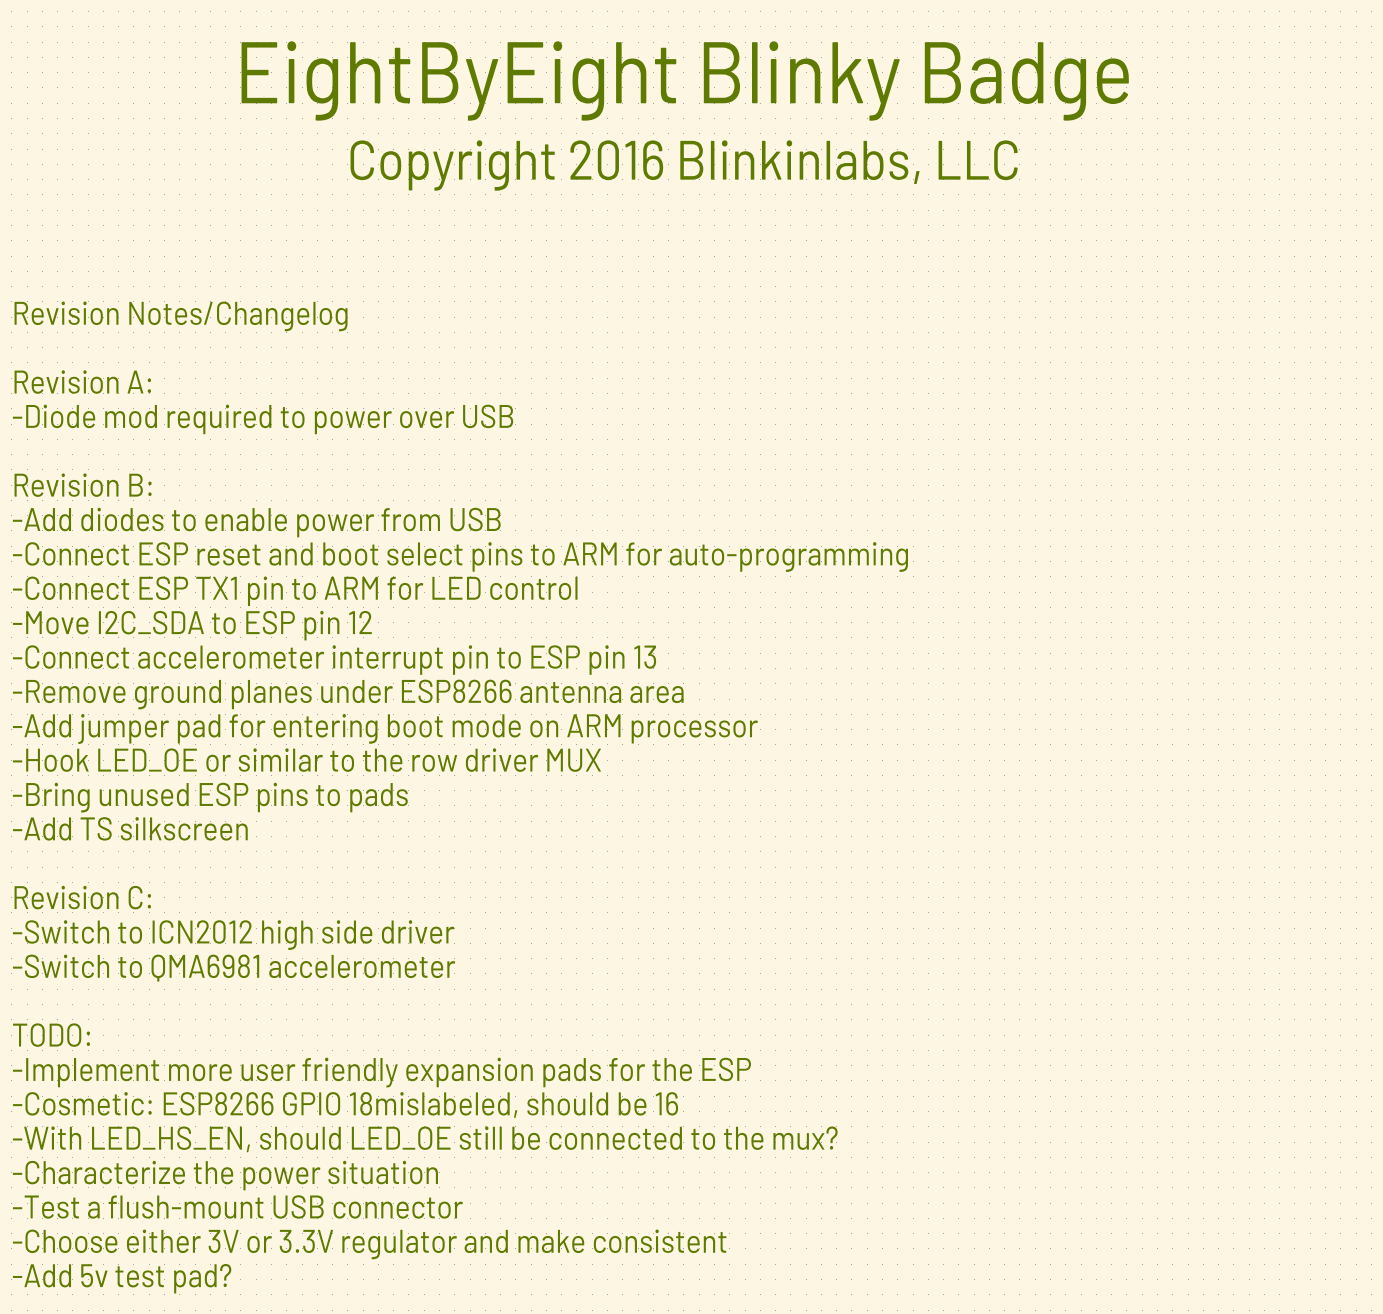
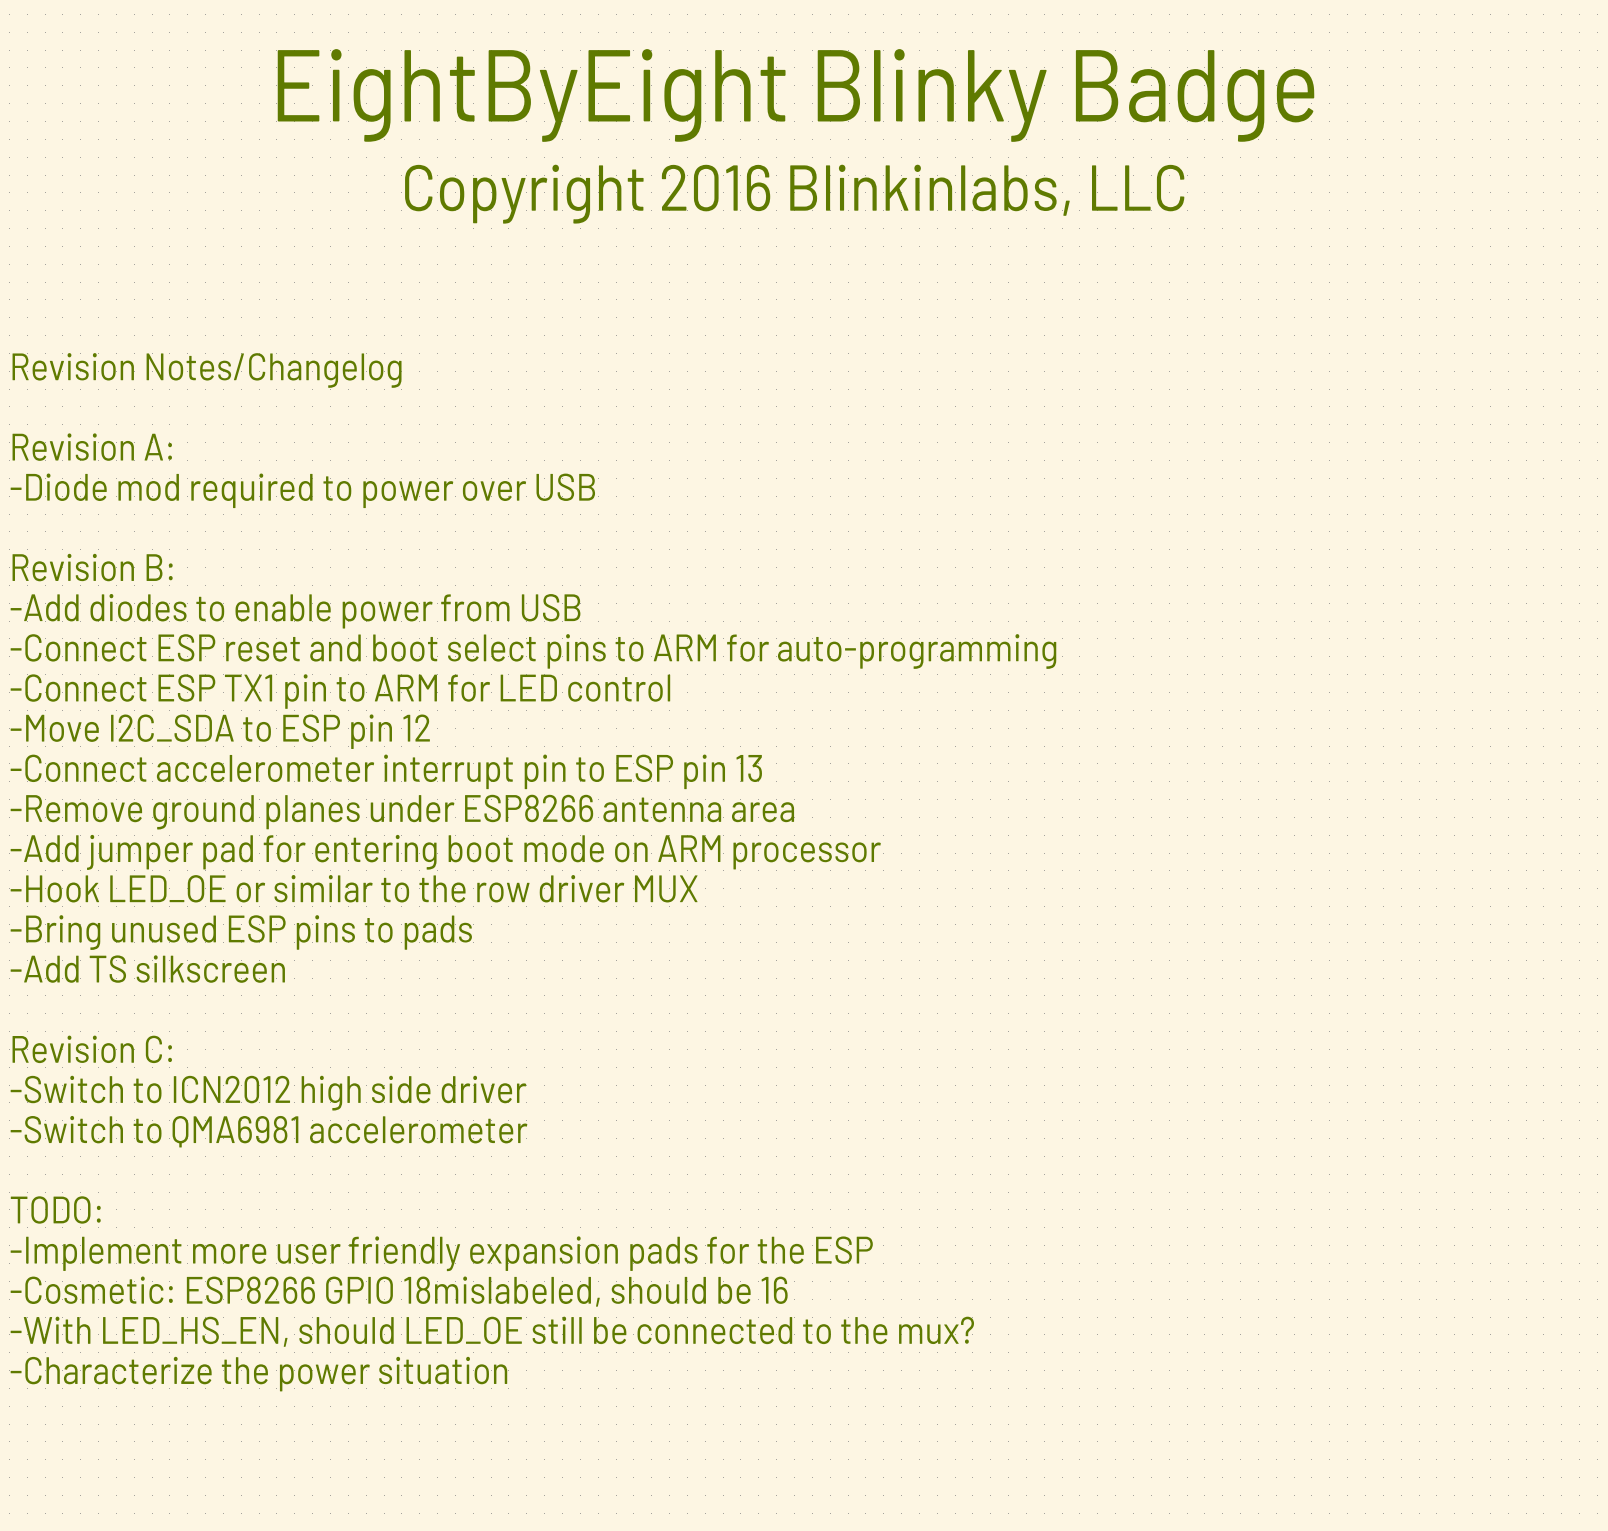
text: -Test a flush-mount USB connector (237, 1206) -> none
text: -Choose either 3V or 3.3V regulator and make consistent (369, 1244) -> none
text: -Add 5v test pad? (122, 1278) -> none

